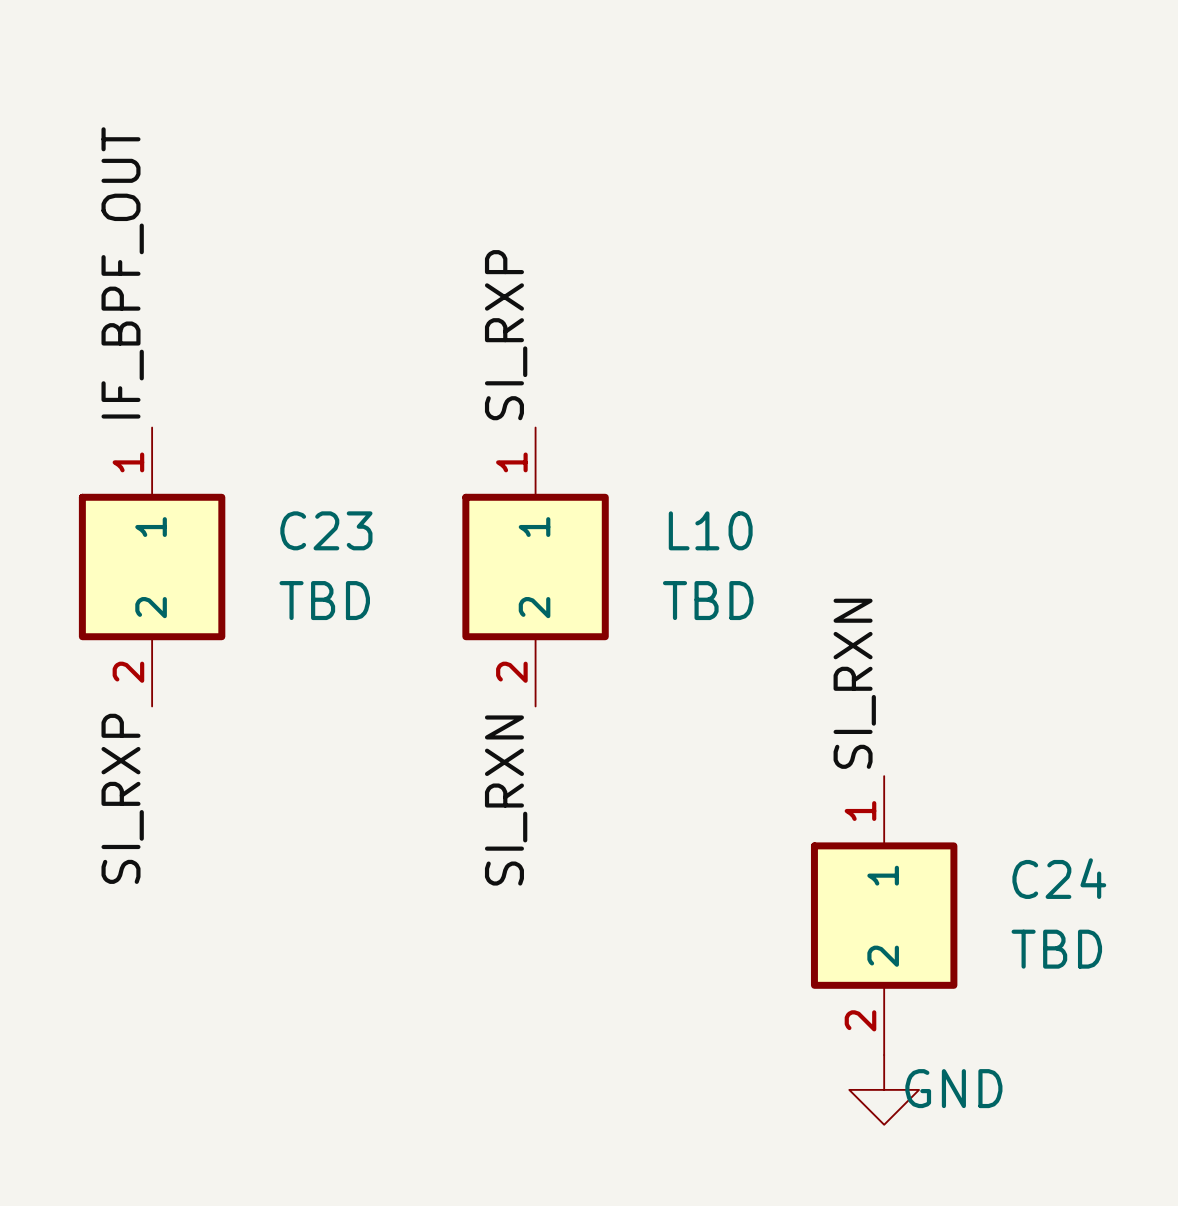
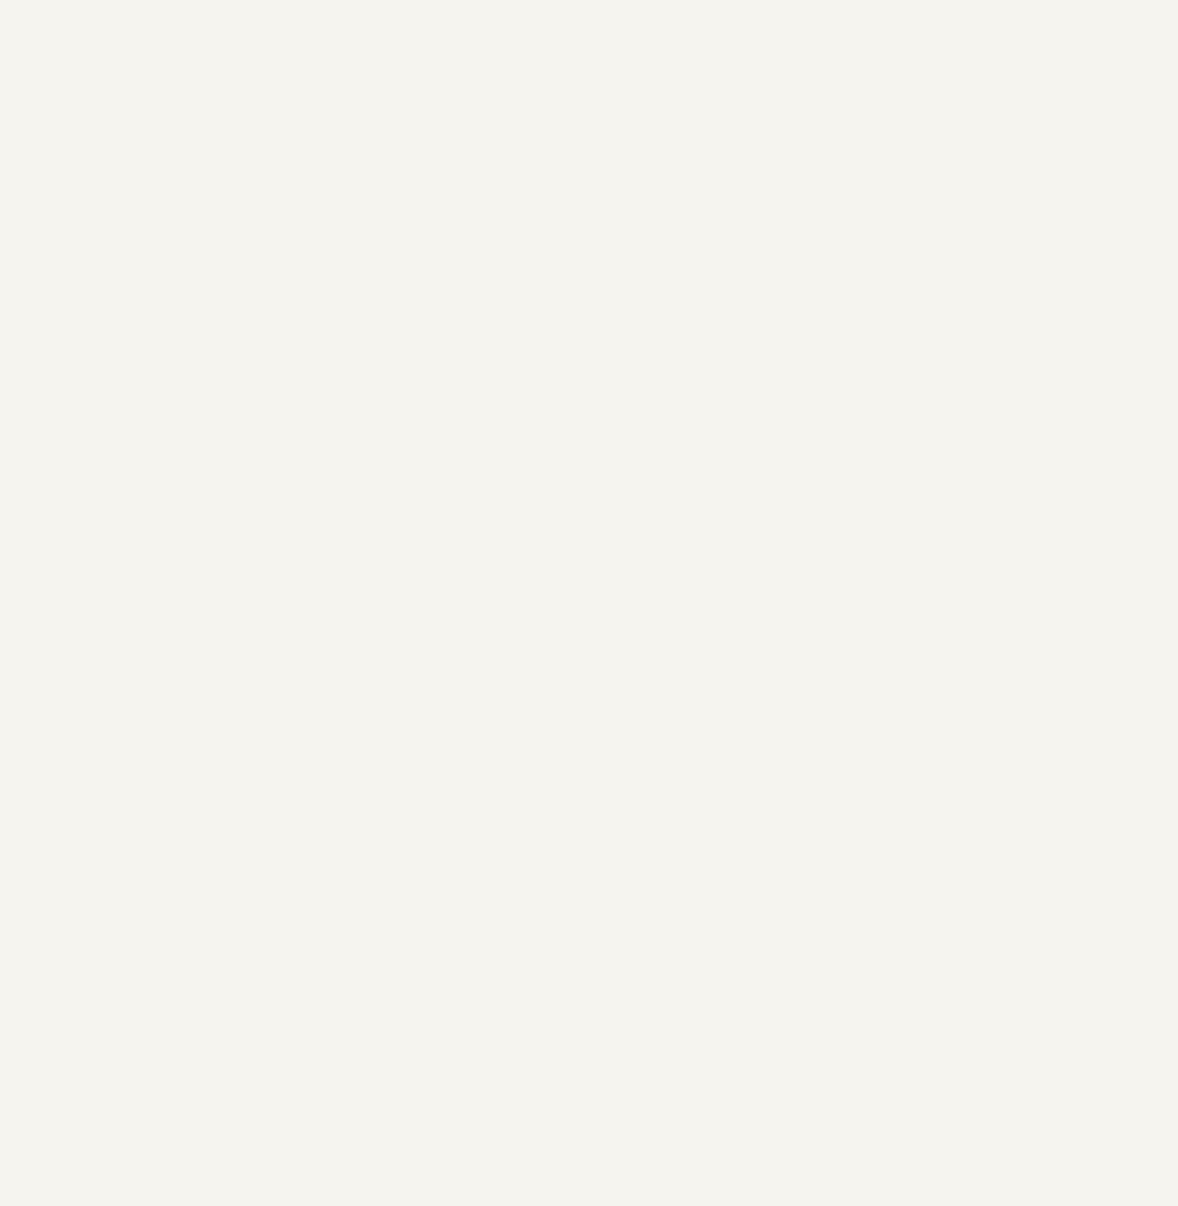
label: IF_BPF_OUT (122, 272) -> none
label: SI_RXP (506, 335) -> none
C23: TBD (152, 567) -> none
L10: TBD (535, 567) -> none
label: SI_RXN (854, 683) -> none
label: SI_RXP (122, 798) -> none
label: SI_RXN (506, 800) -> none
C24: TBD (884, 915) -> none
power symbol: GND (884, 1089) -> none

